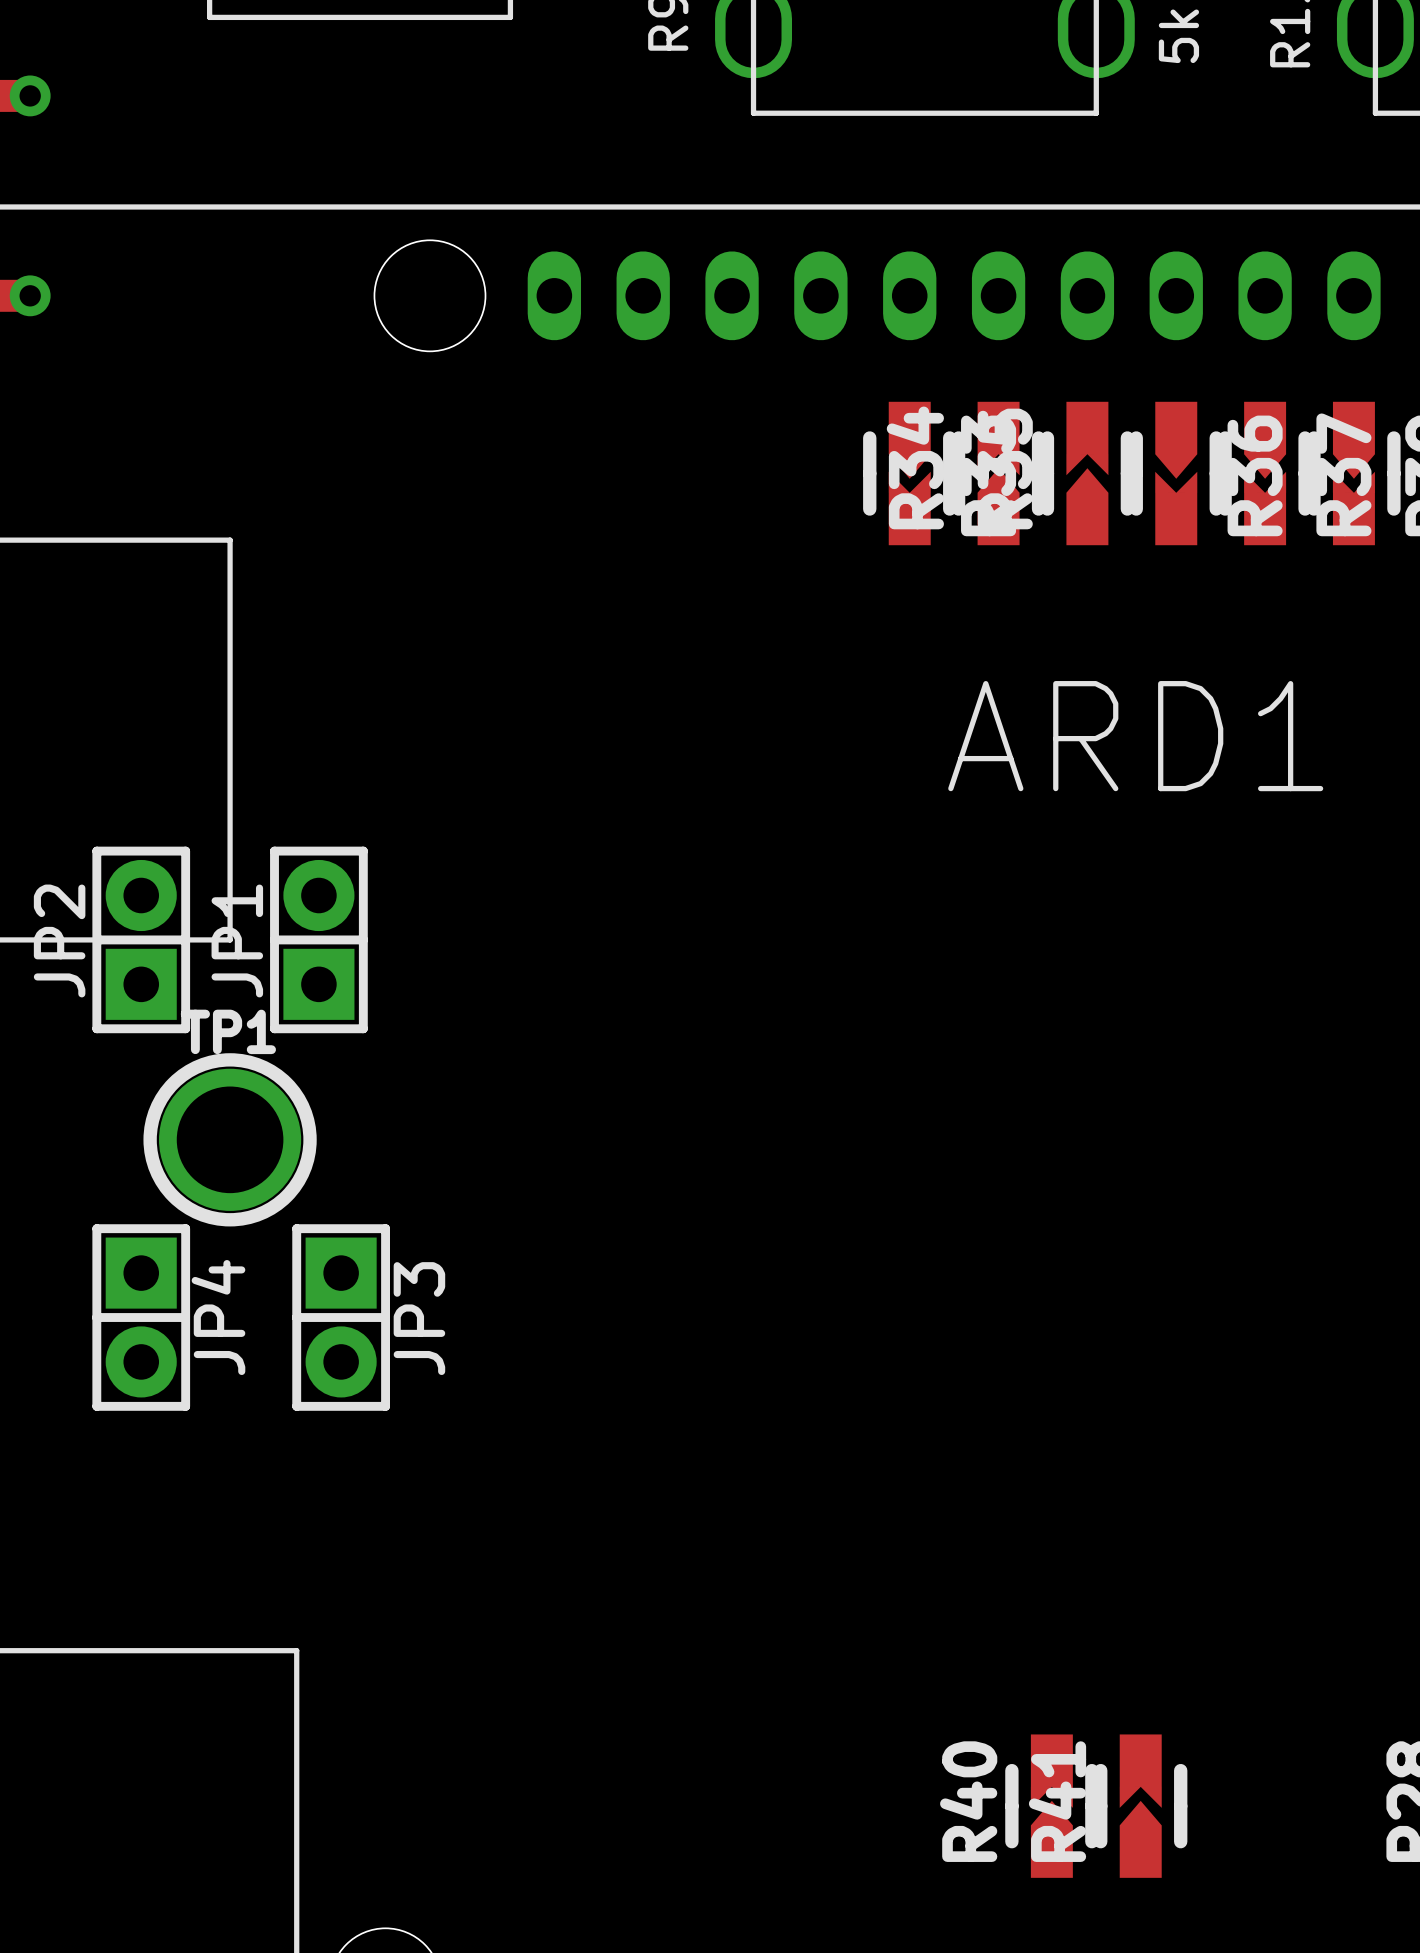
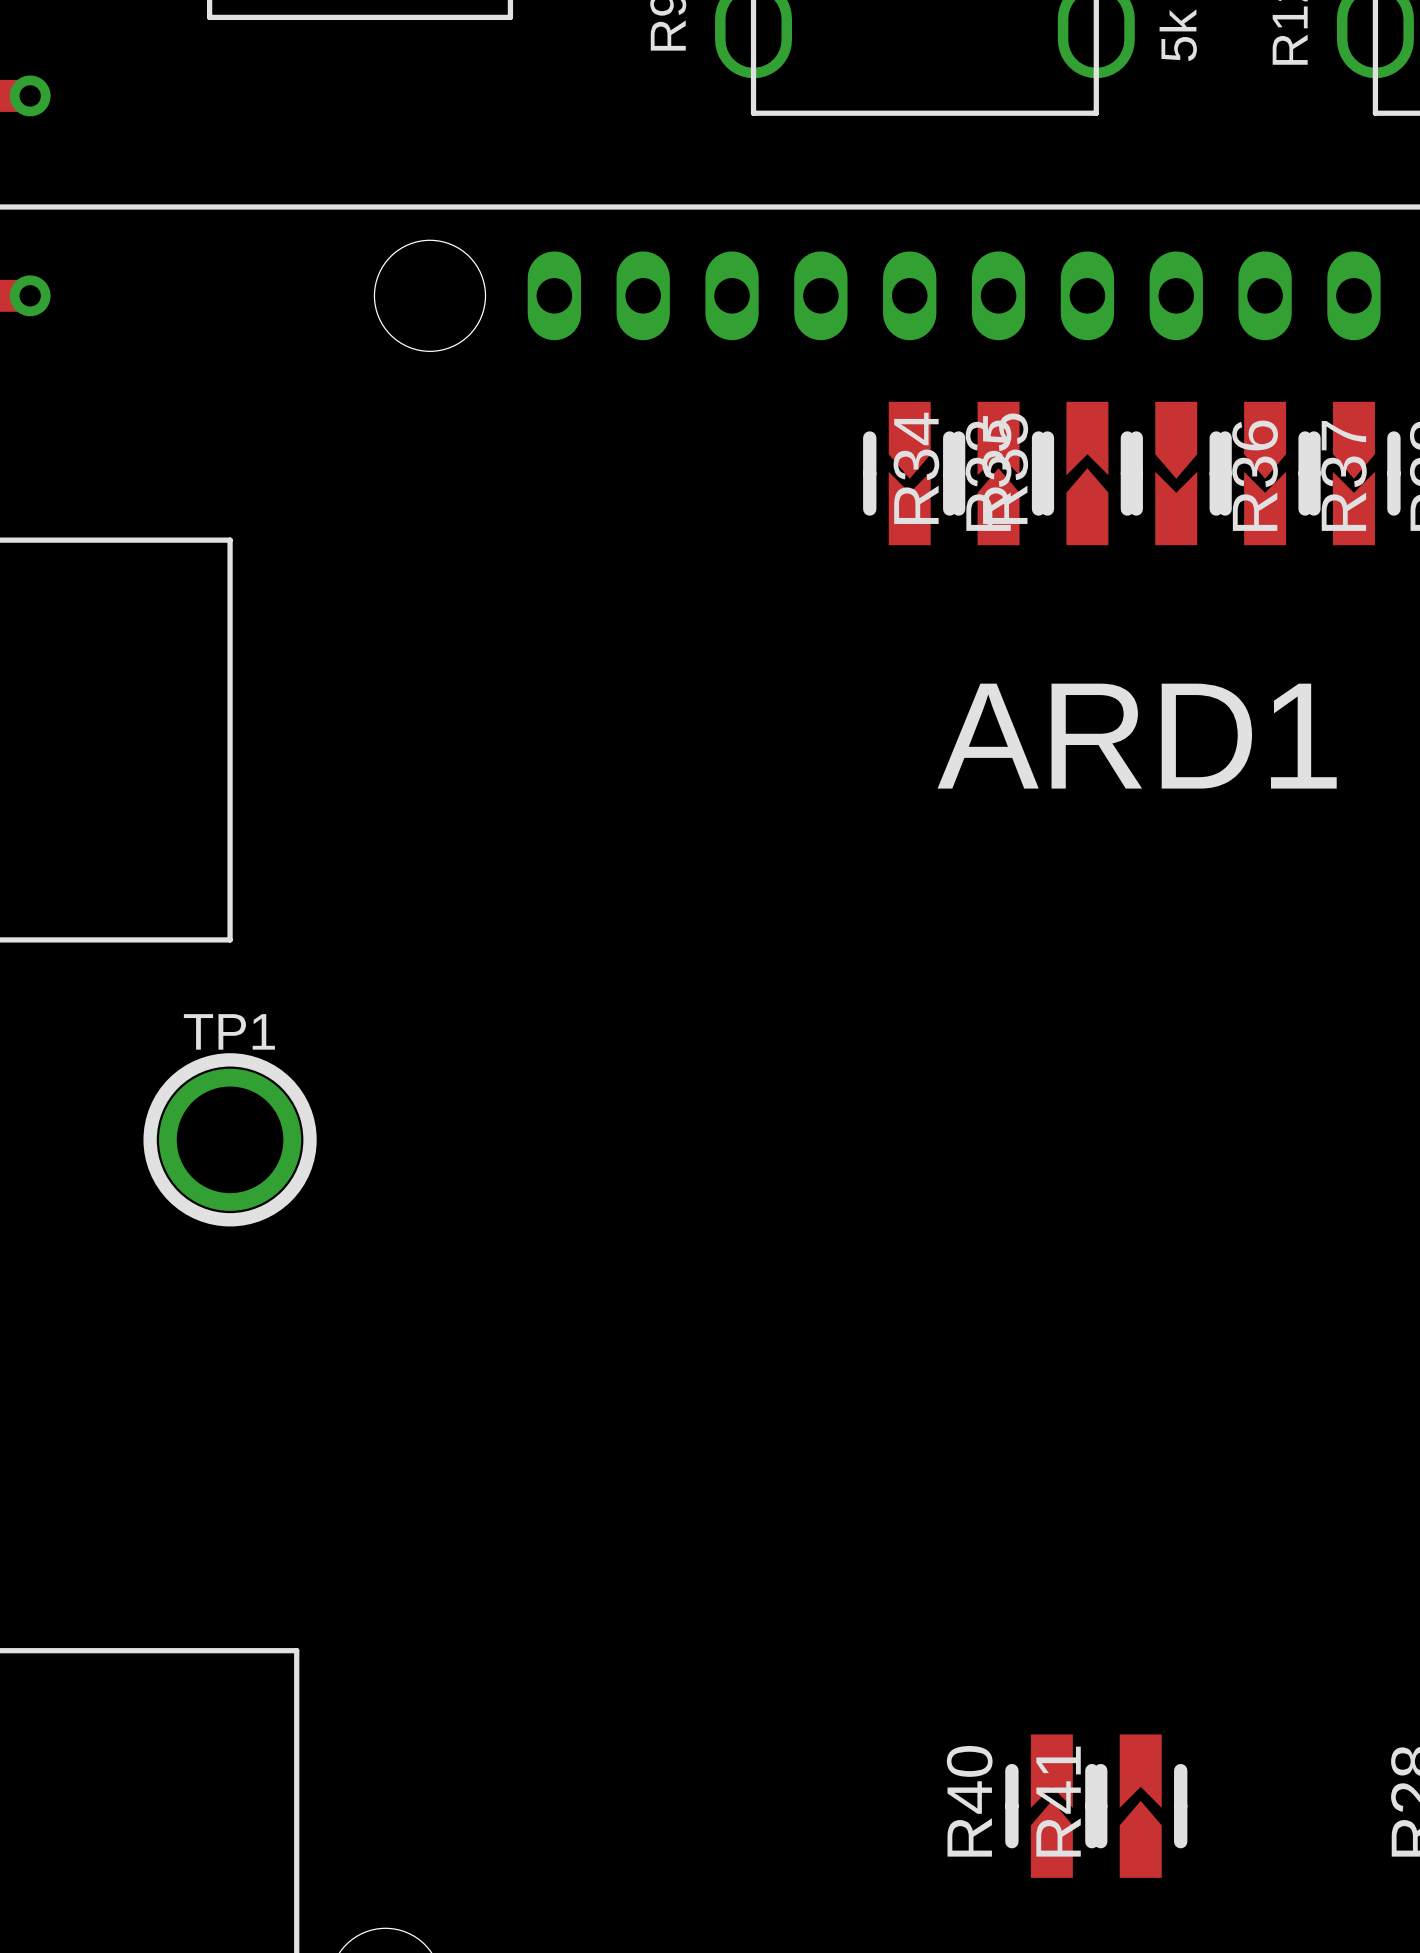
JP2: (141, 939) -> none
JP1: (318, 939) -> none
JP4: (141, 1317) -> none
JP3: (341, 1317) -> none

